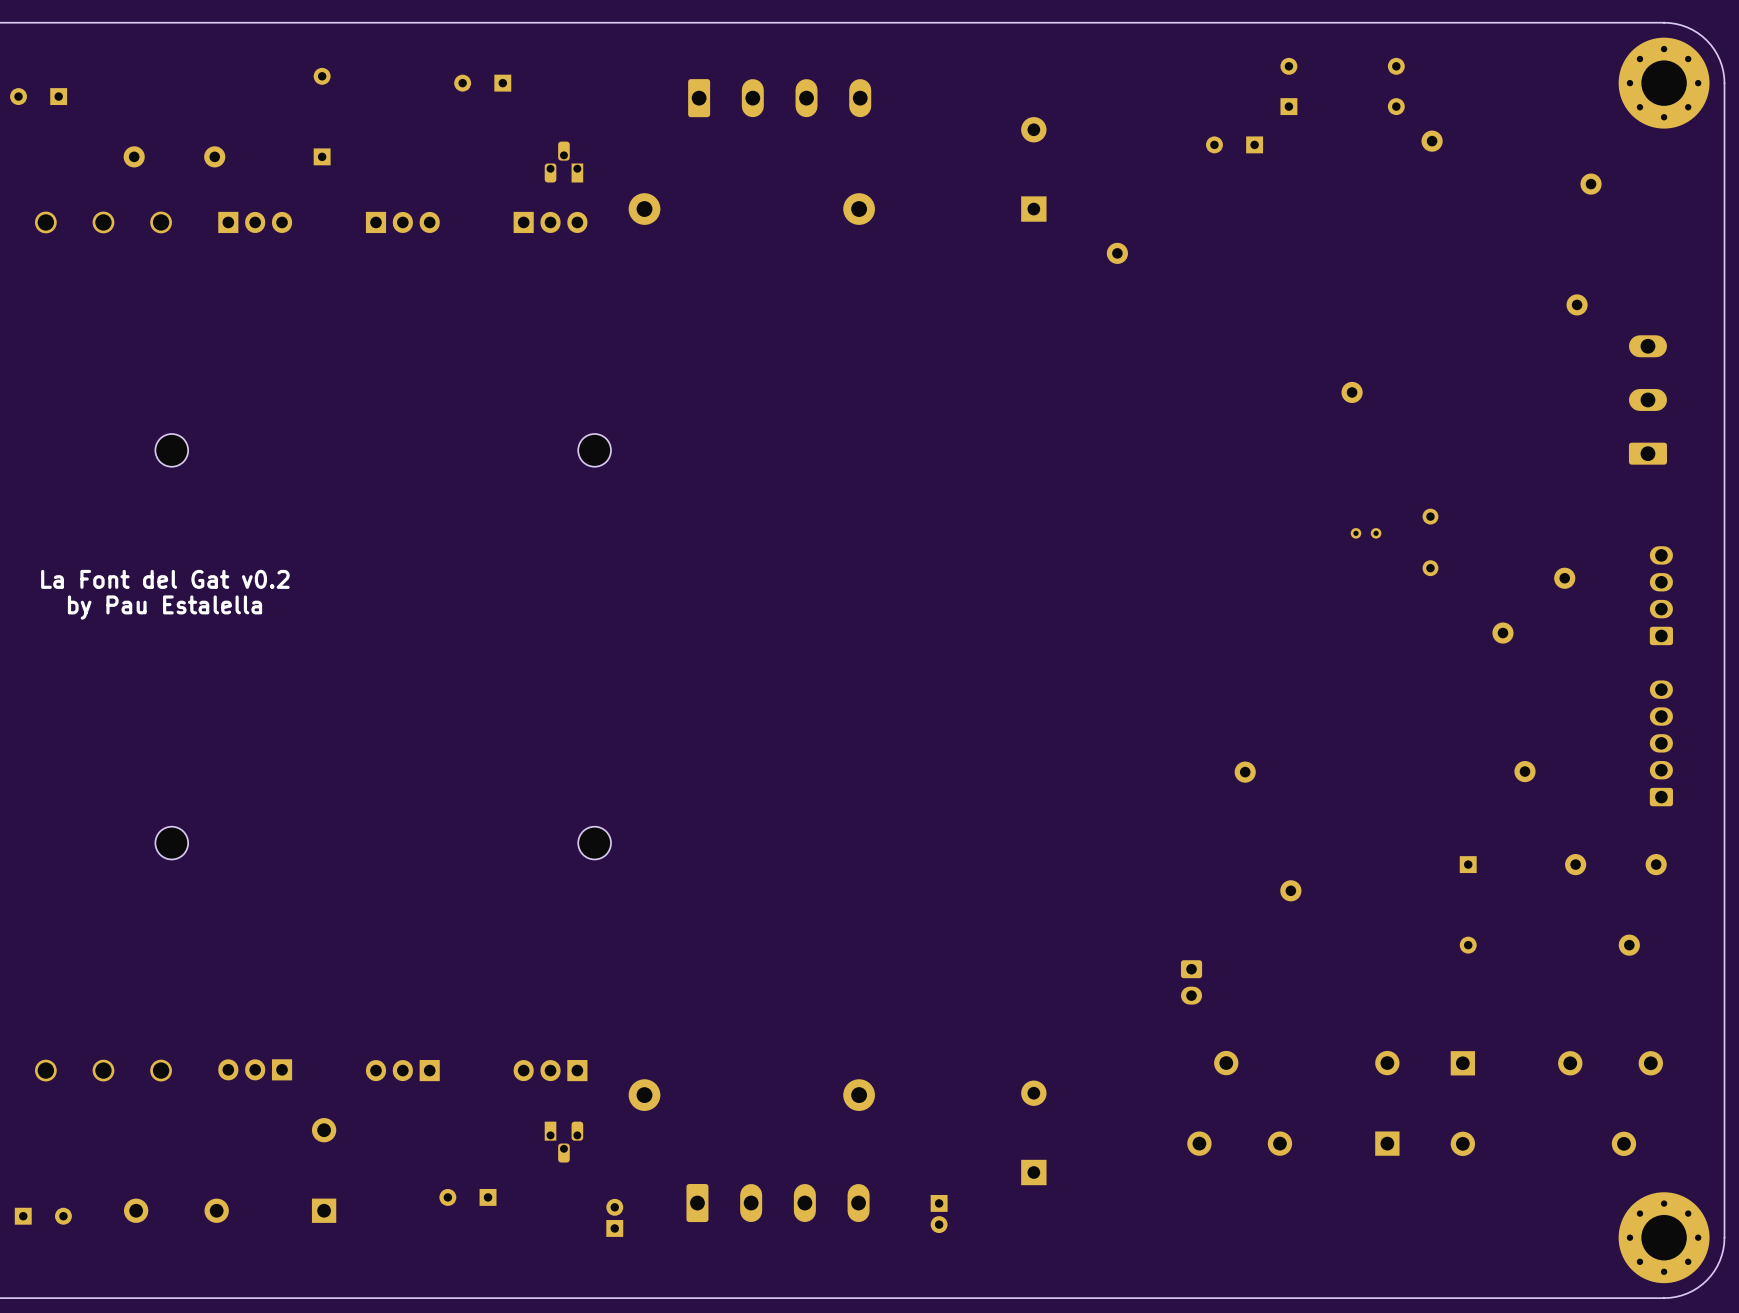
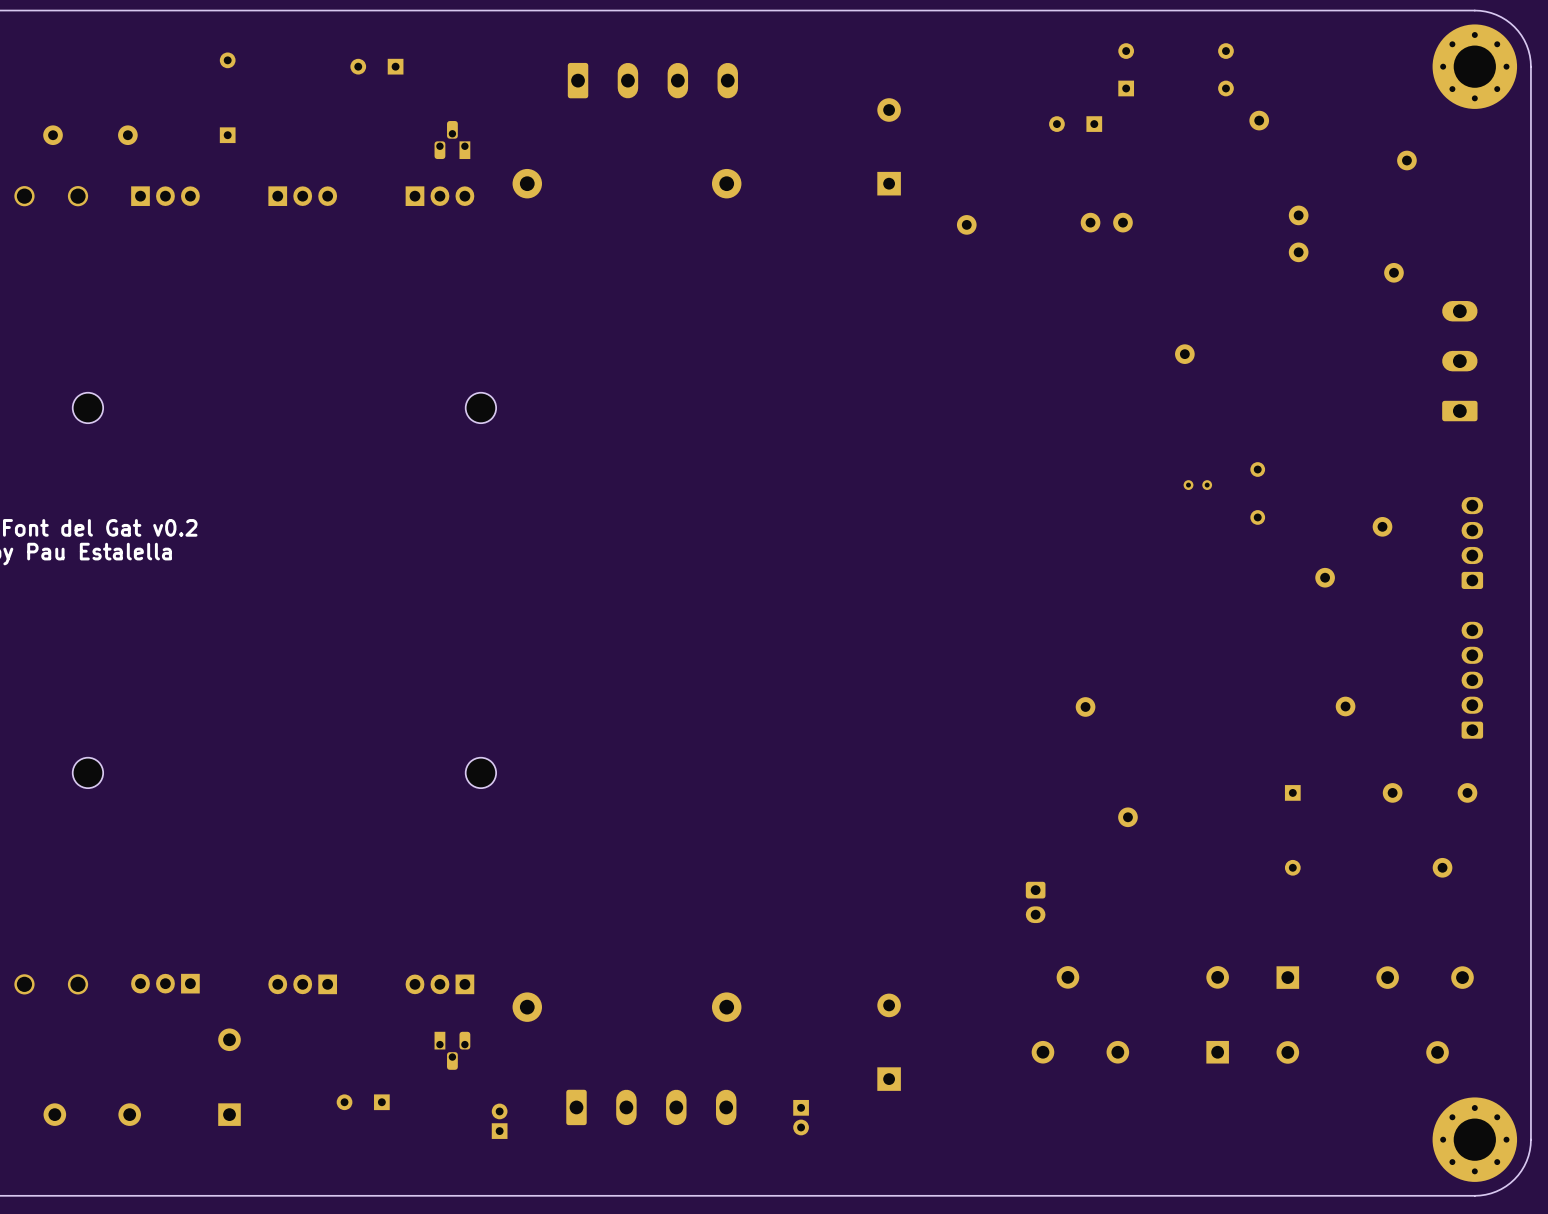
part: none -> (1298, 215)
part: none -> (1090, 222)
part: none -> (1122, 222)
part: none -> (1298, 252)

